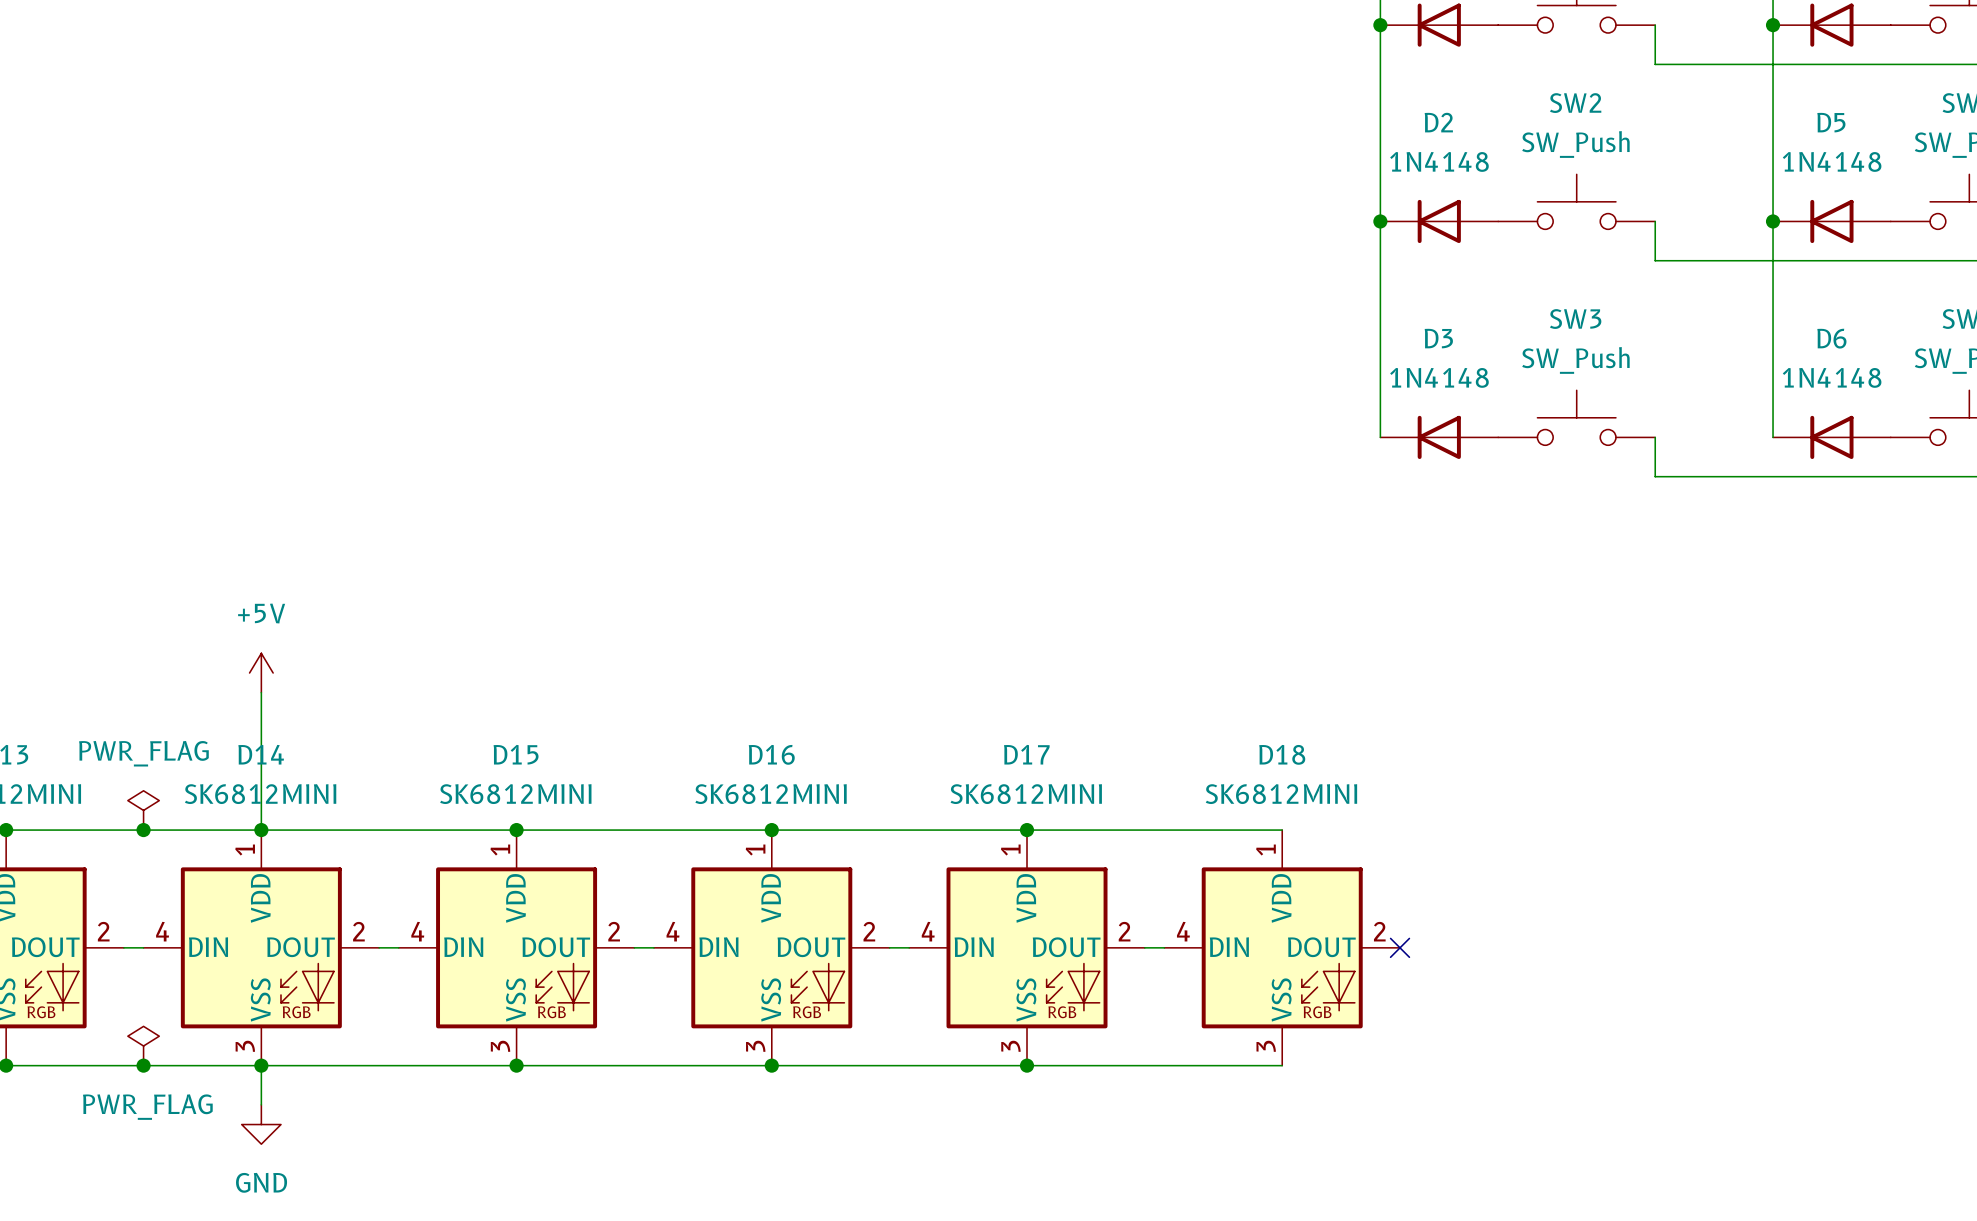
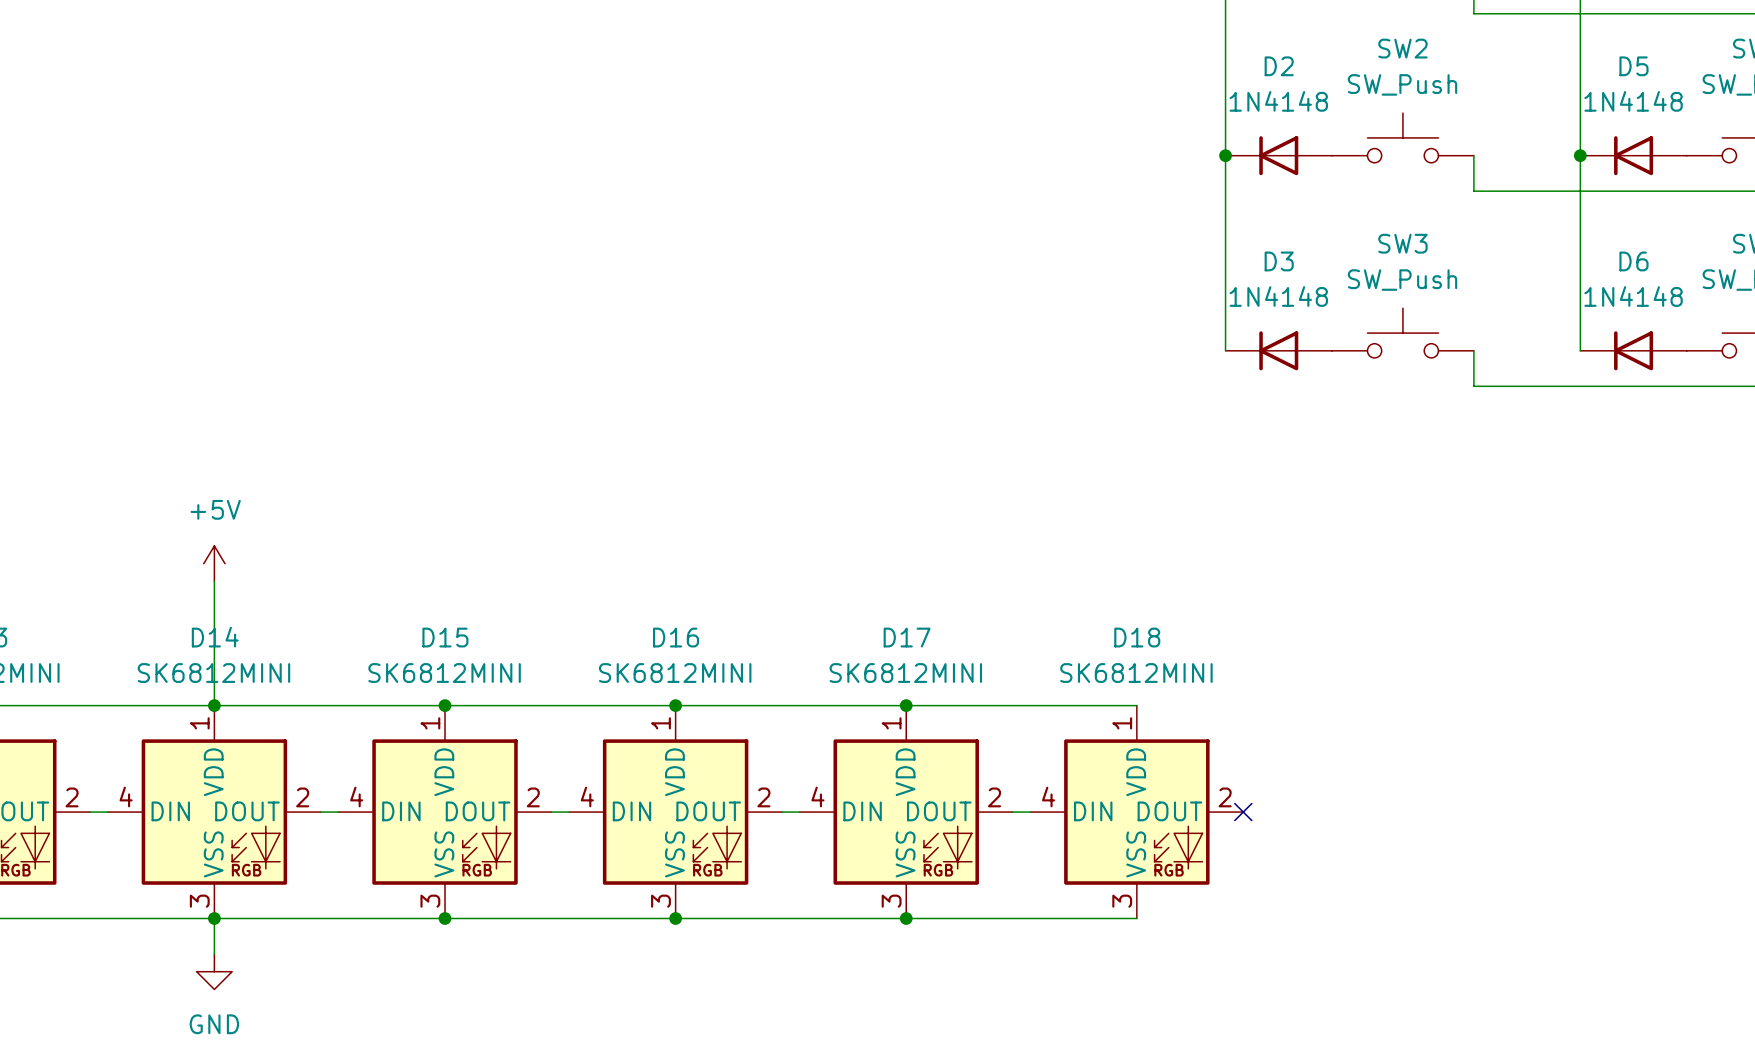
power symbol: PWR_FLAG (143, 810) -> none
junction: (143, 830) -> none
power symbol: PWR_FLAG (143, 1046) -> none
junction: (143, 1065) -> none

